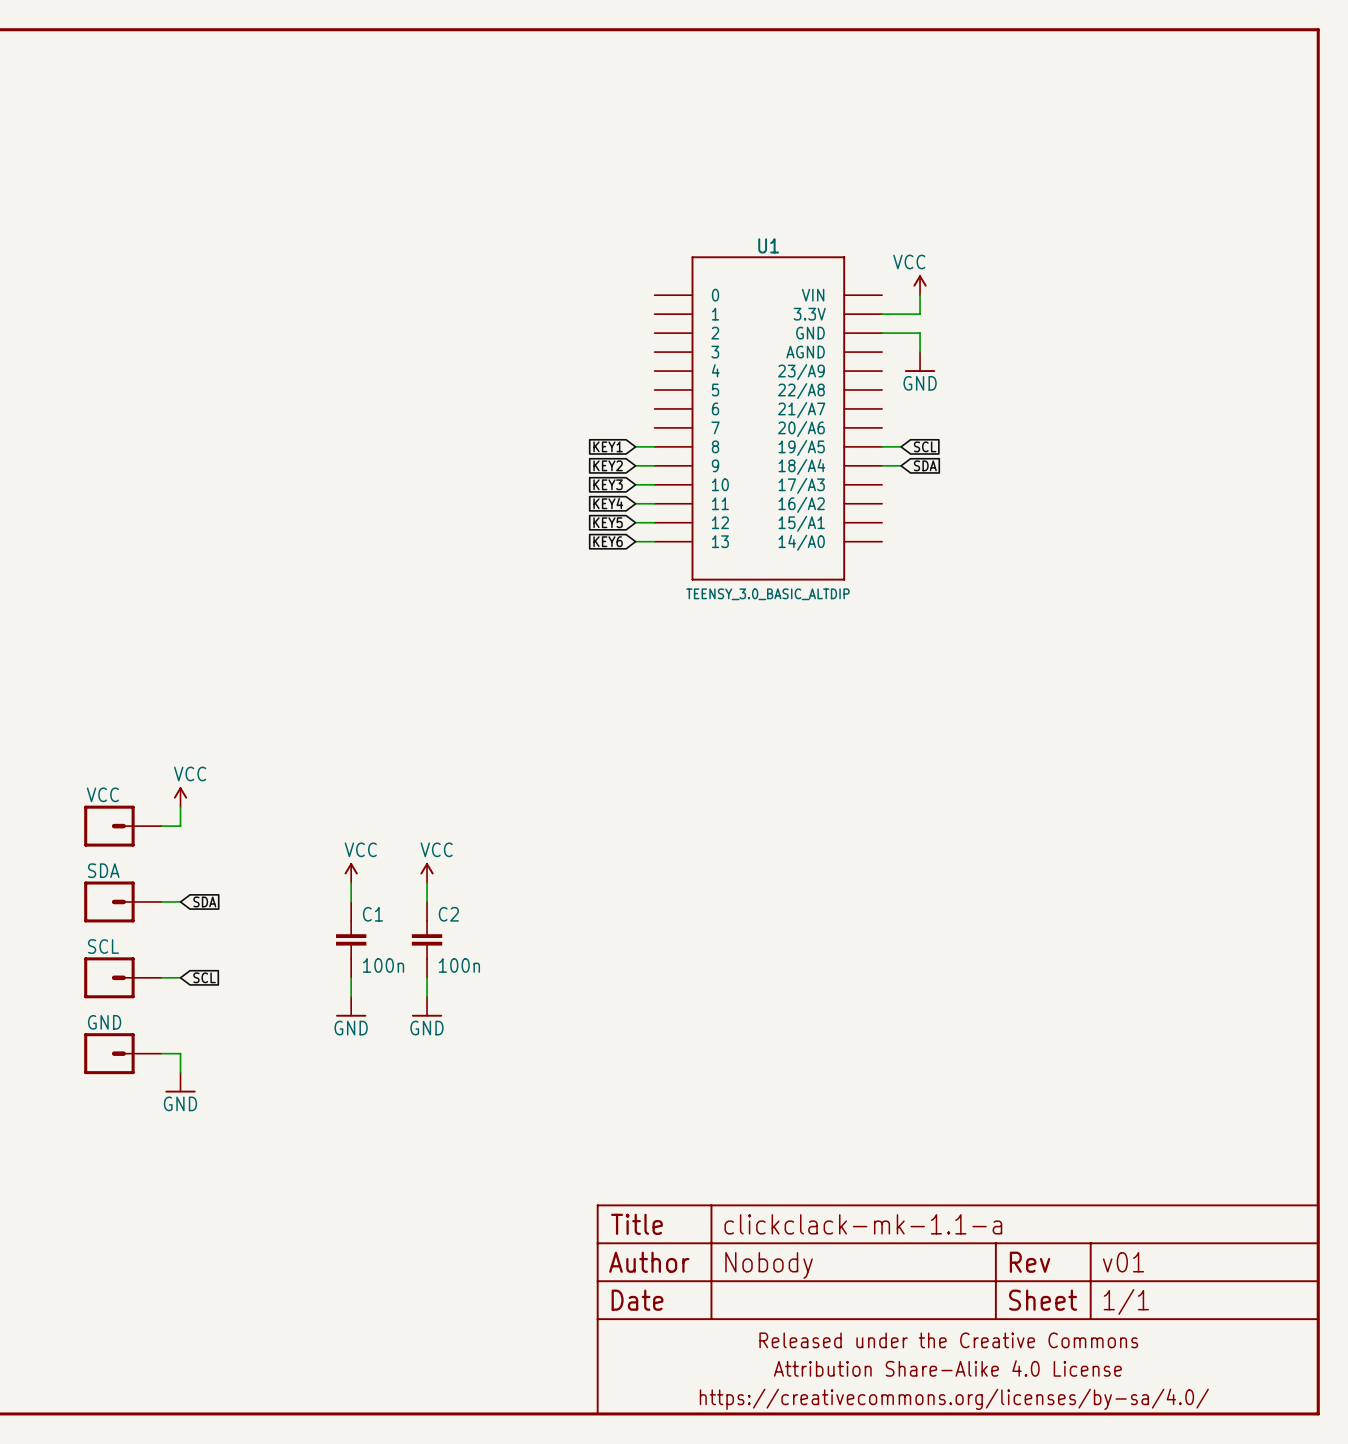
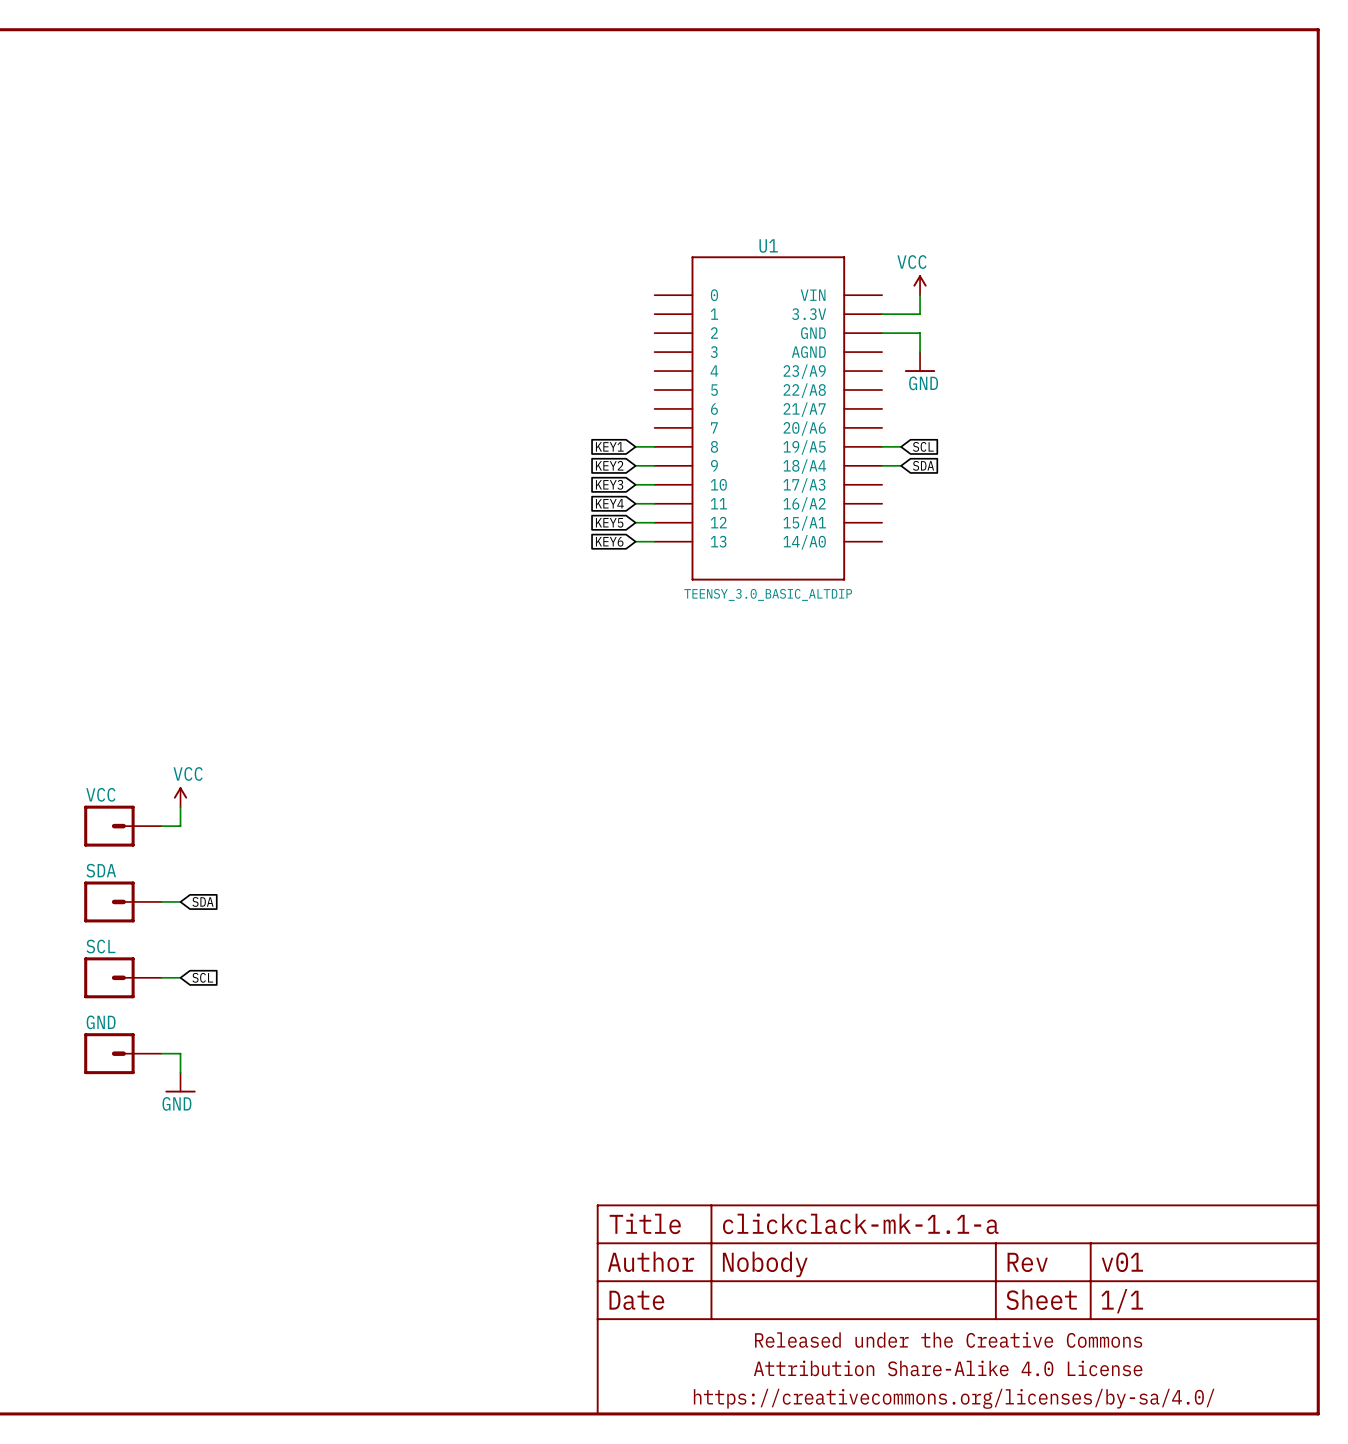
power symbol: VCC (351, 873) -> none
power symbol: VCC (427, 873) -> none
wire: (351, 883) (351, 901) -> none
wire: (427, 883) (427, 901) -> none
C1: 100n (351, 939) -> none
C2: 100n (427, 939) -> none
wire: (351, 977) (351, 996) -> none
wire: (427, 977) (427, 996) -> none
power symbol: GND (351, 1006) -> none
power symbol: GND (427, 1006) -> none

